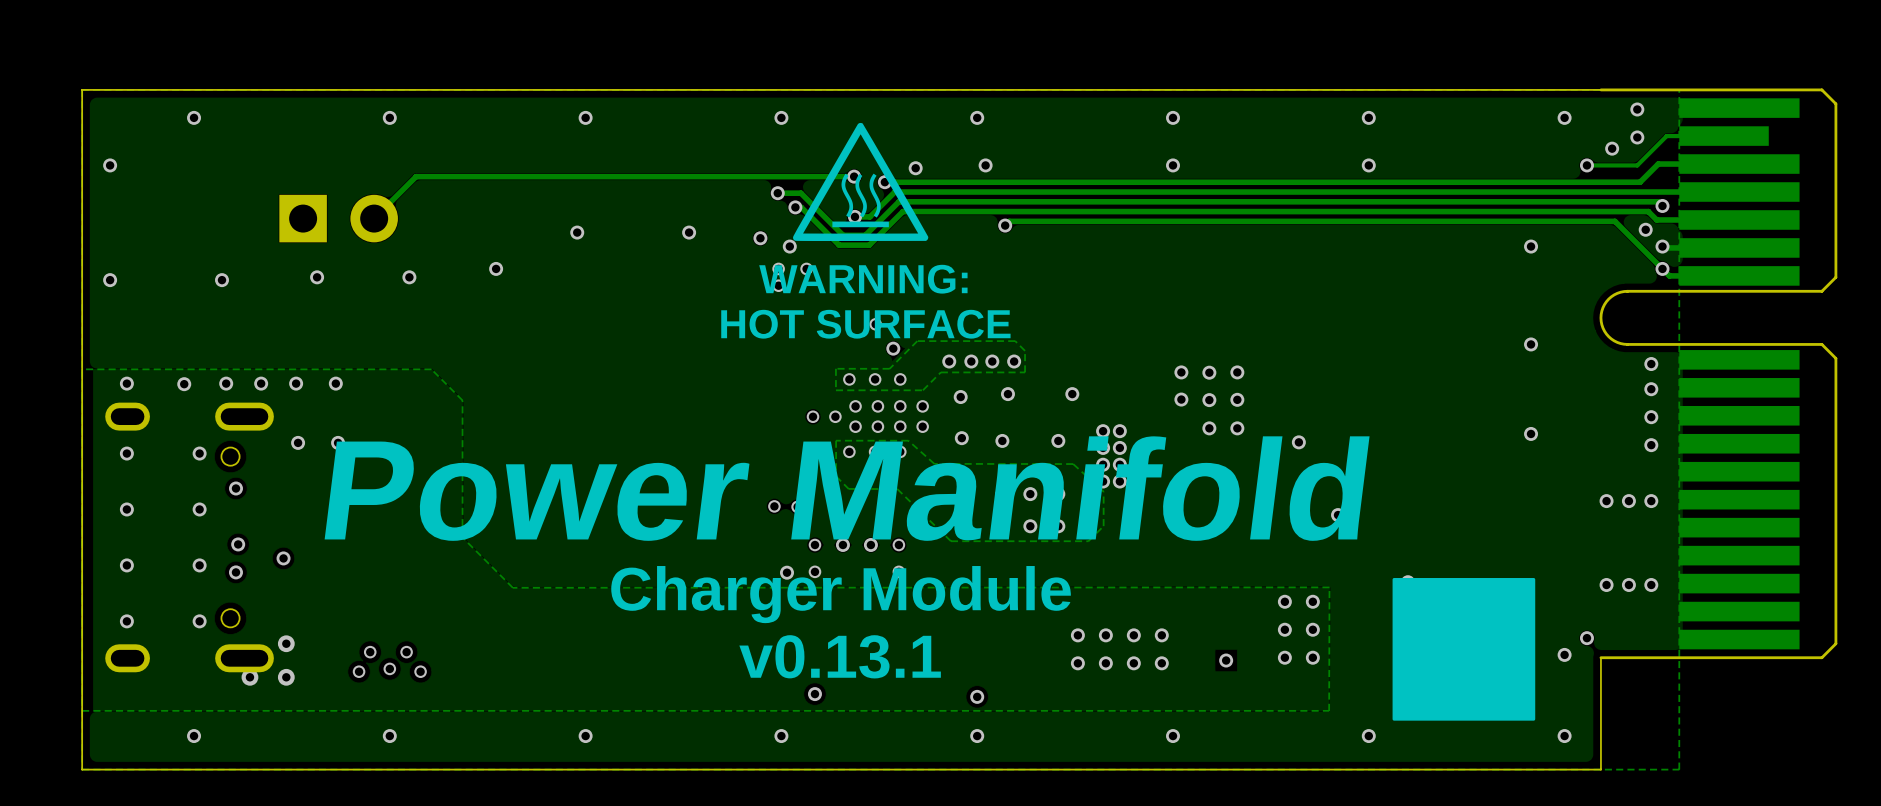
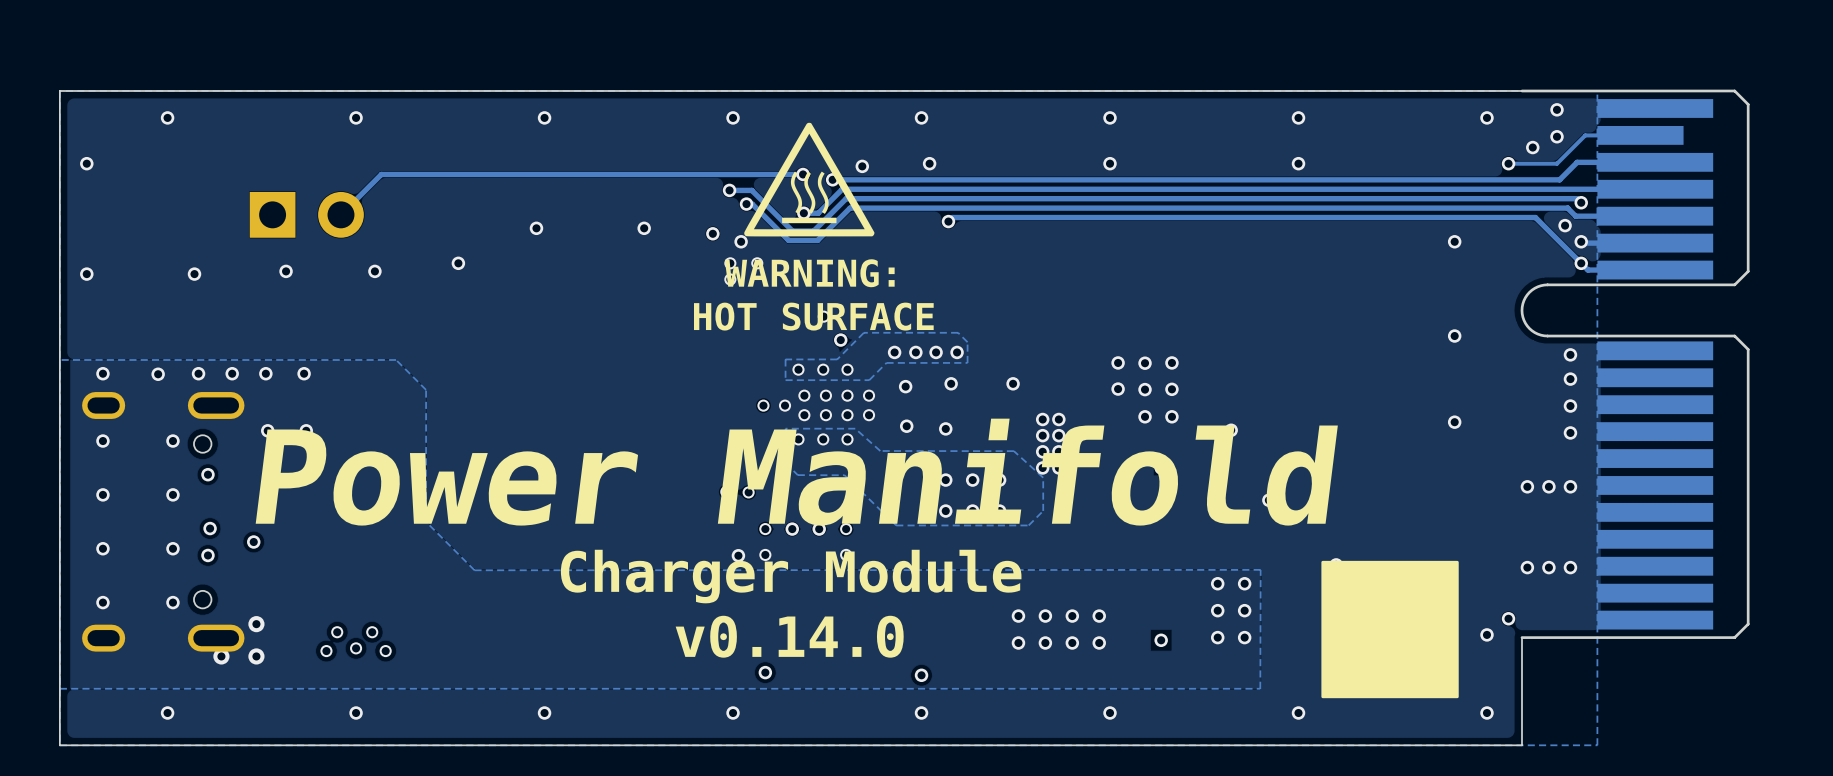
text: v0.13.1 (840, 656) -> v0.14.0 (789, 636)

